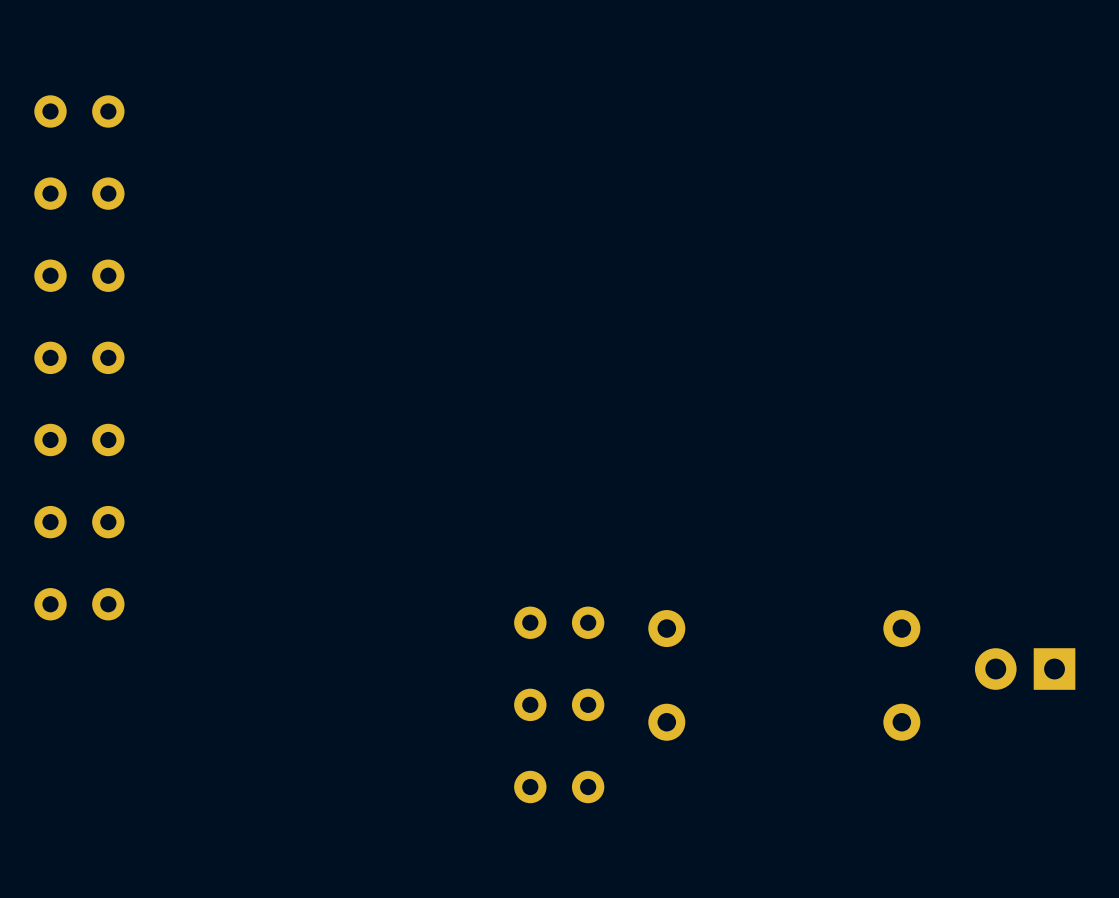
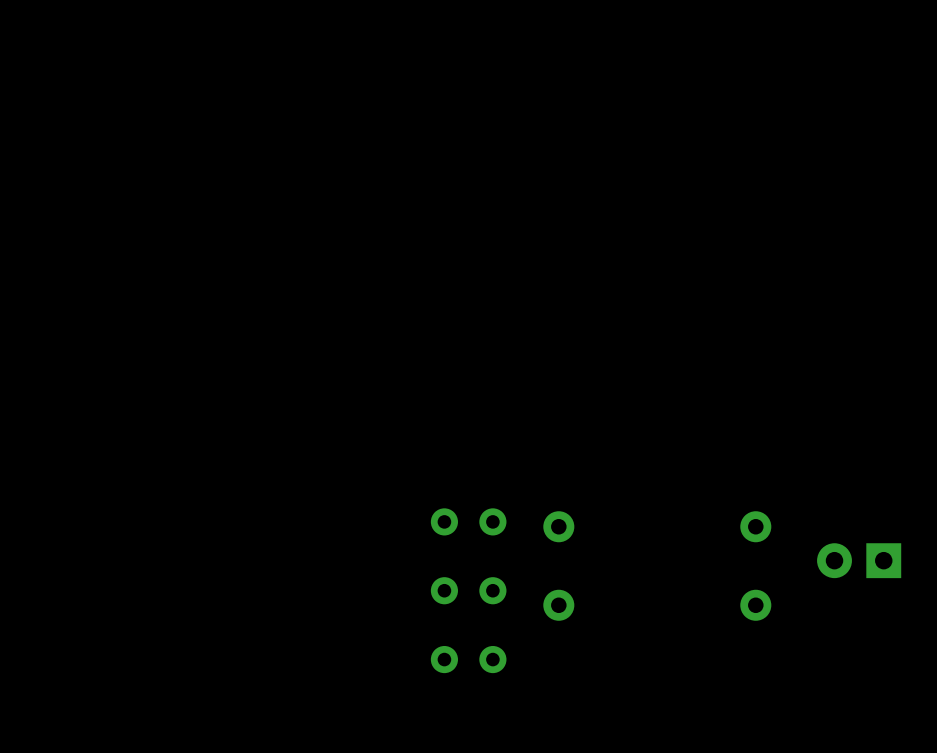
part: (79, 111) -> none
part: (79, 193) -> none
part: (79, 275) -> none
part: (79, 357) -> none
part: (79, 439) -> none
part: (79, 522) -> none
part: (79, 604) -> none

